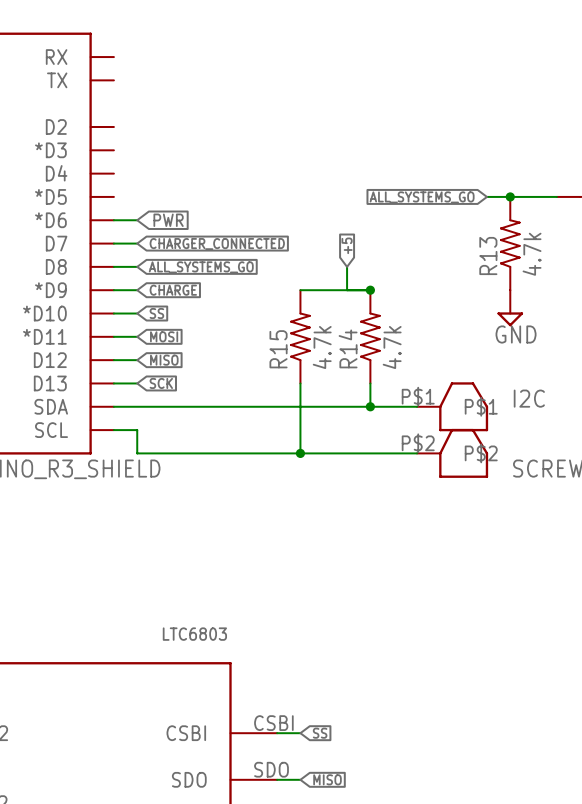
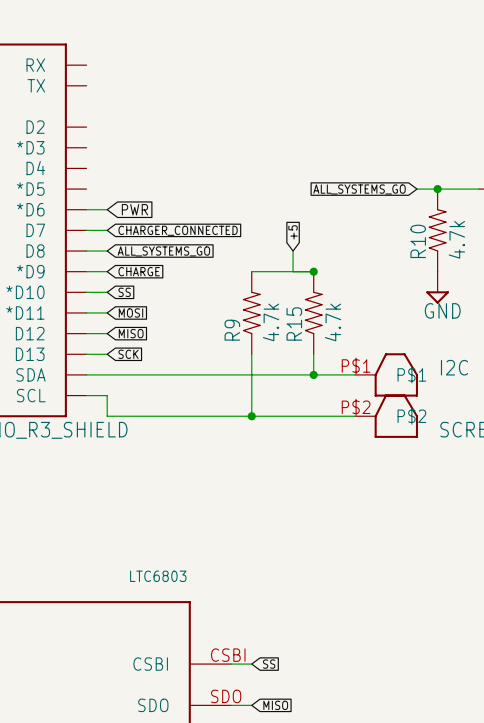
R13 name: R13 (488, 256) -> R10 (418, 241)
R14 name: R14 (348, 348) -> R15 (294, 323)
R15 name: R15 (278, 349) -> R9 (232, 330)

